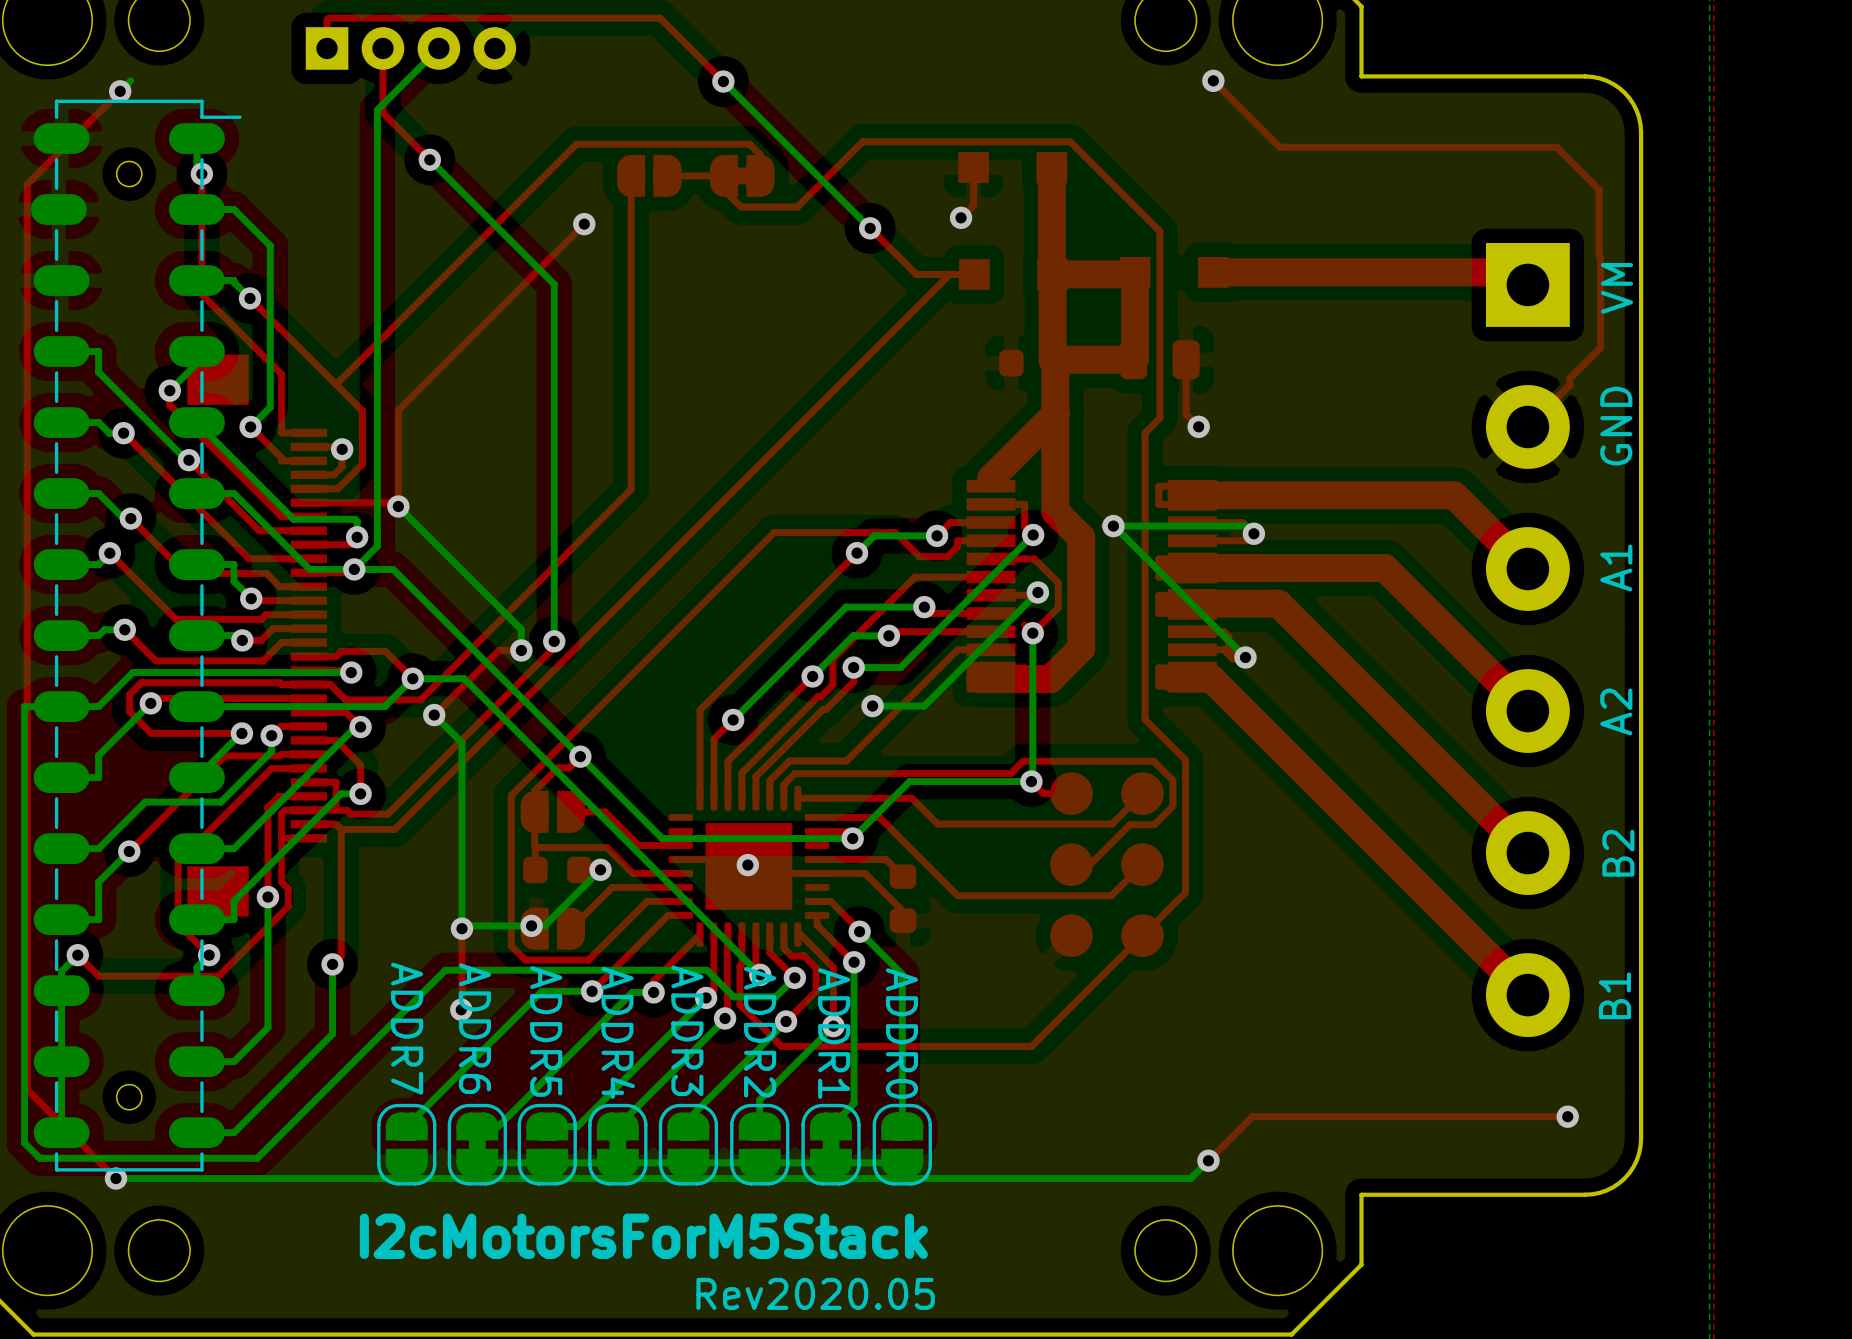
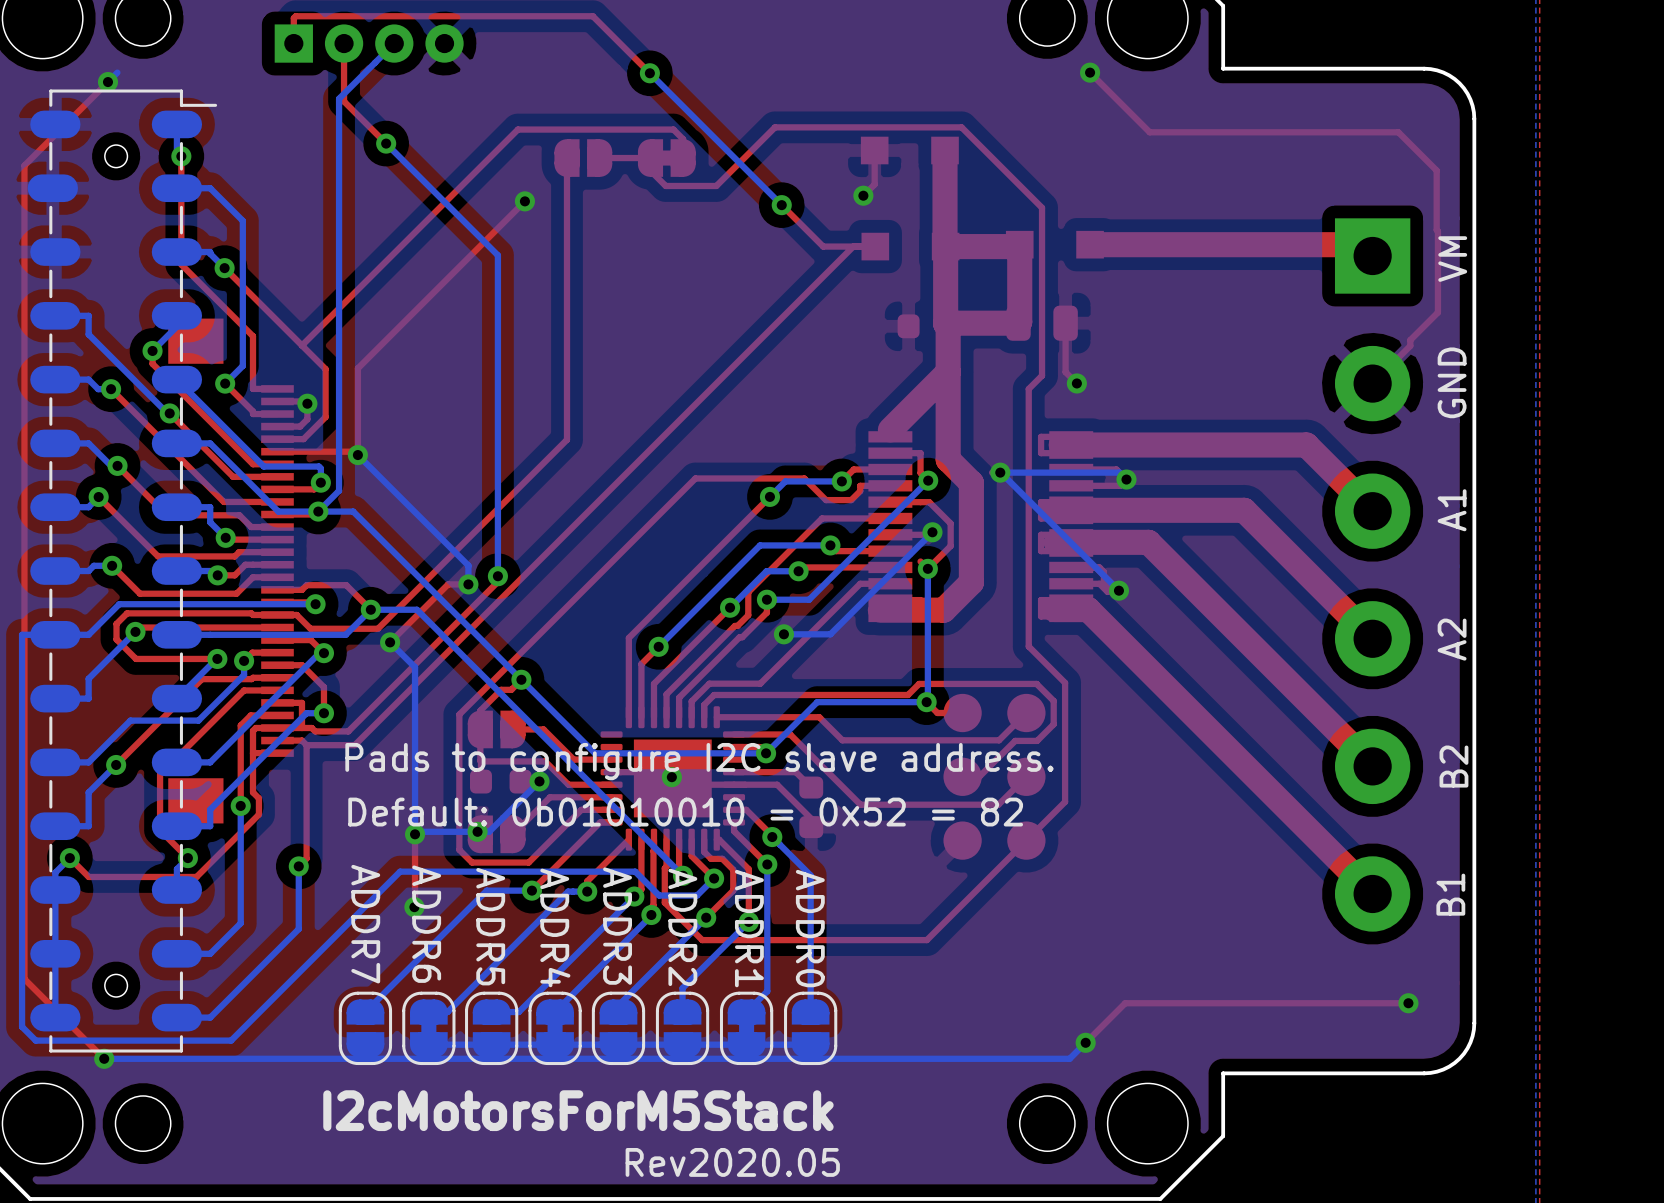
text: none -> Pads to configure I2C slave address. (699, 761)
text: none -> Default: 0b01010010 = 0x52 = 82 (685, 812)

